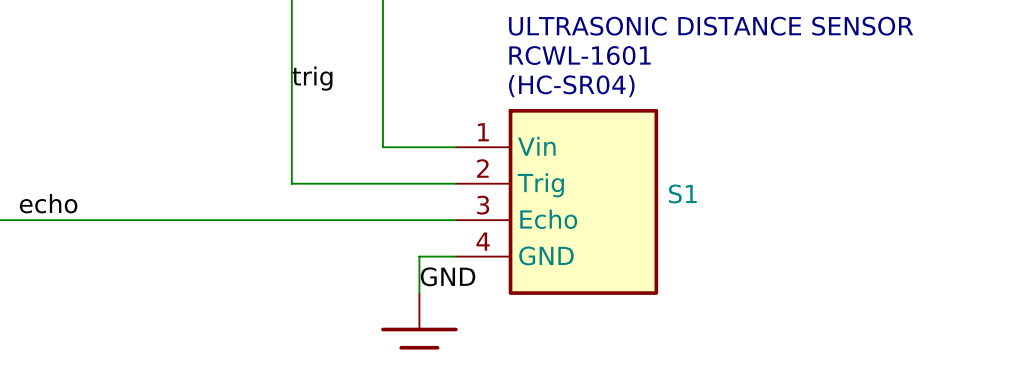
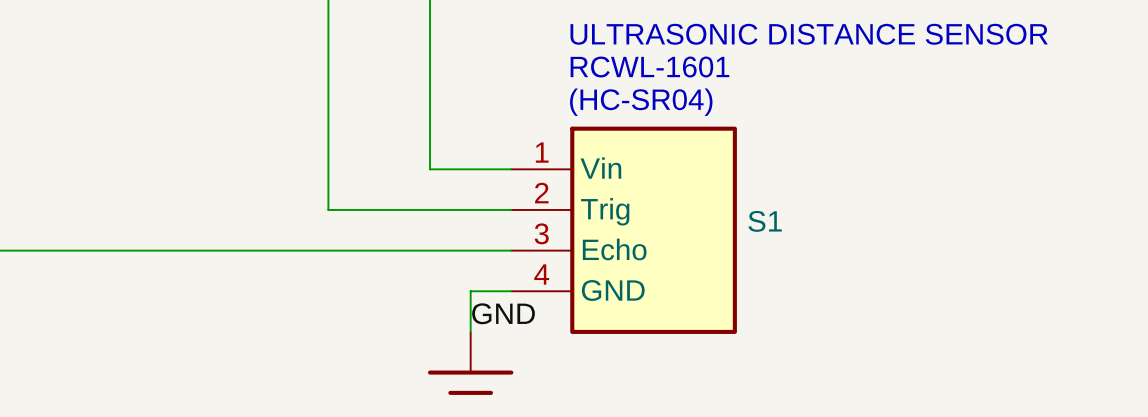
label: trig (312, 78) -> none
label: echo (48, 203) -> none

